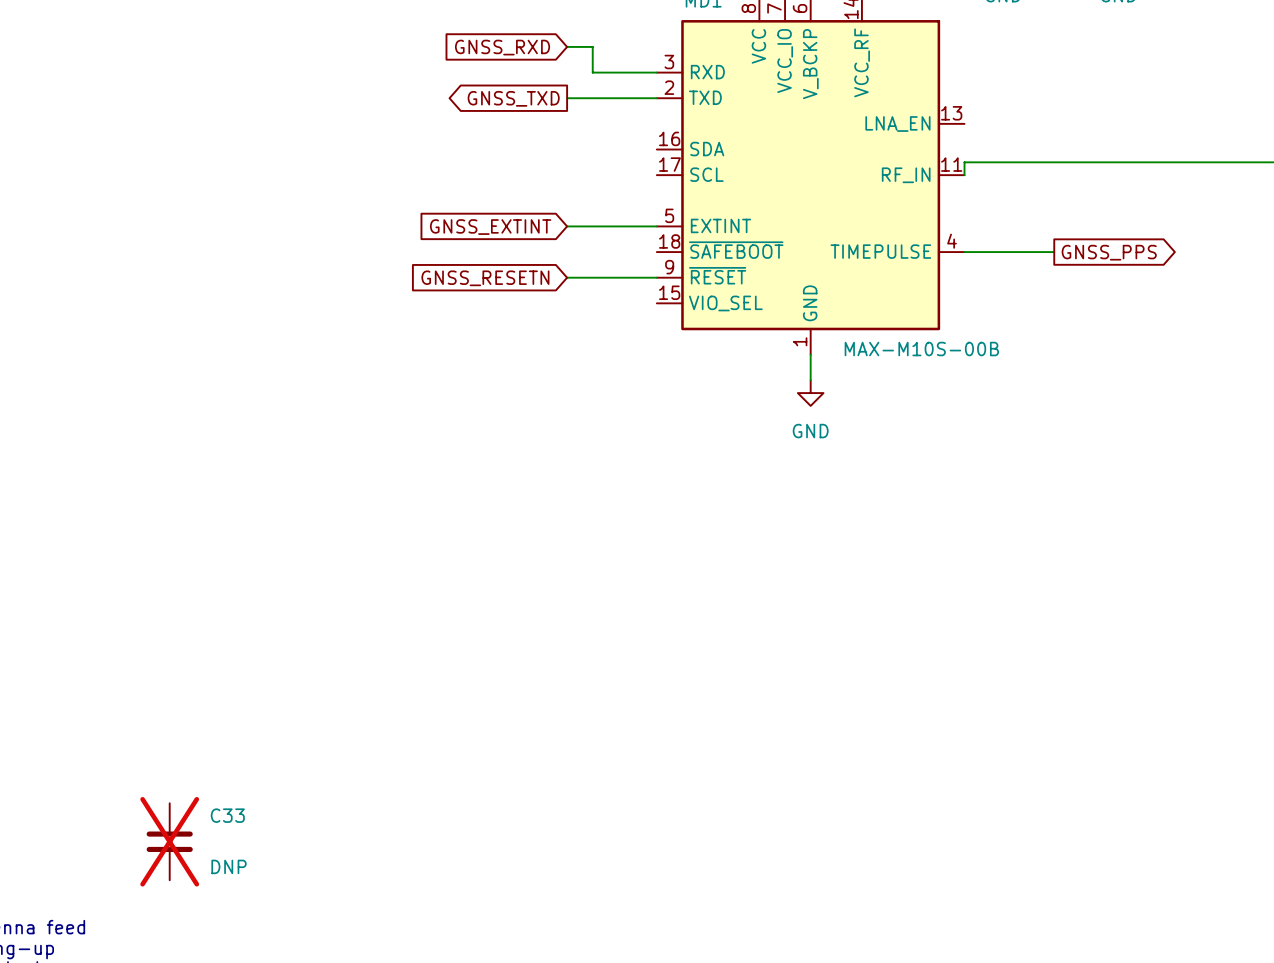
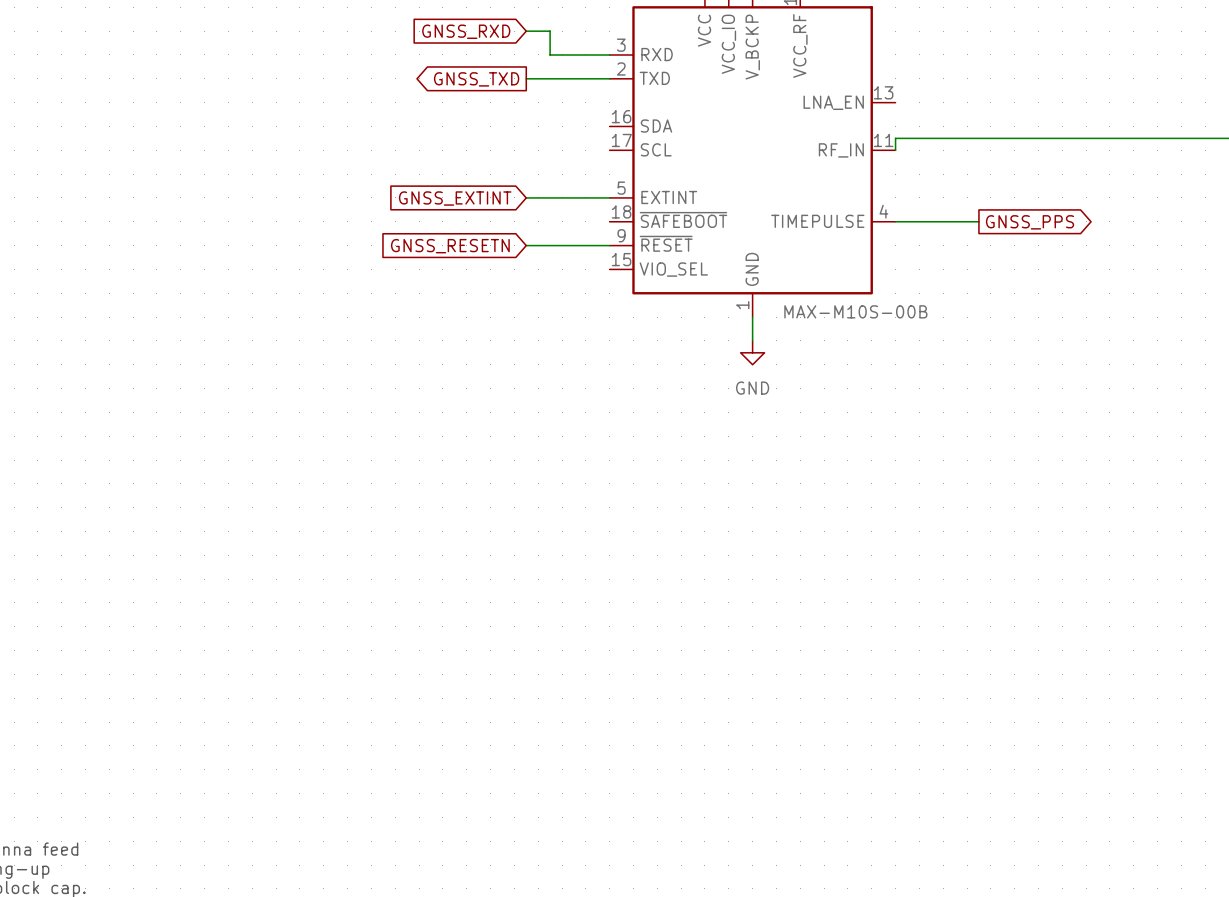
C33: DNP (169, 841) -> none

